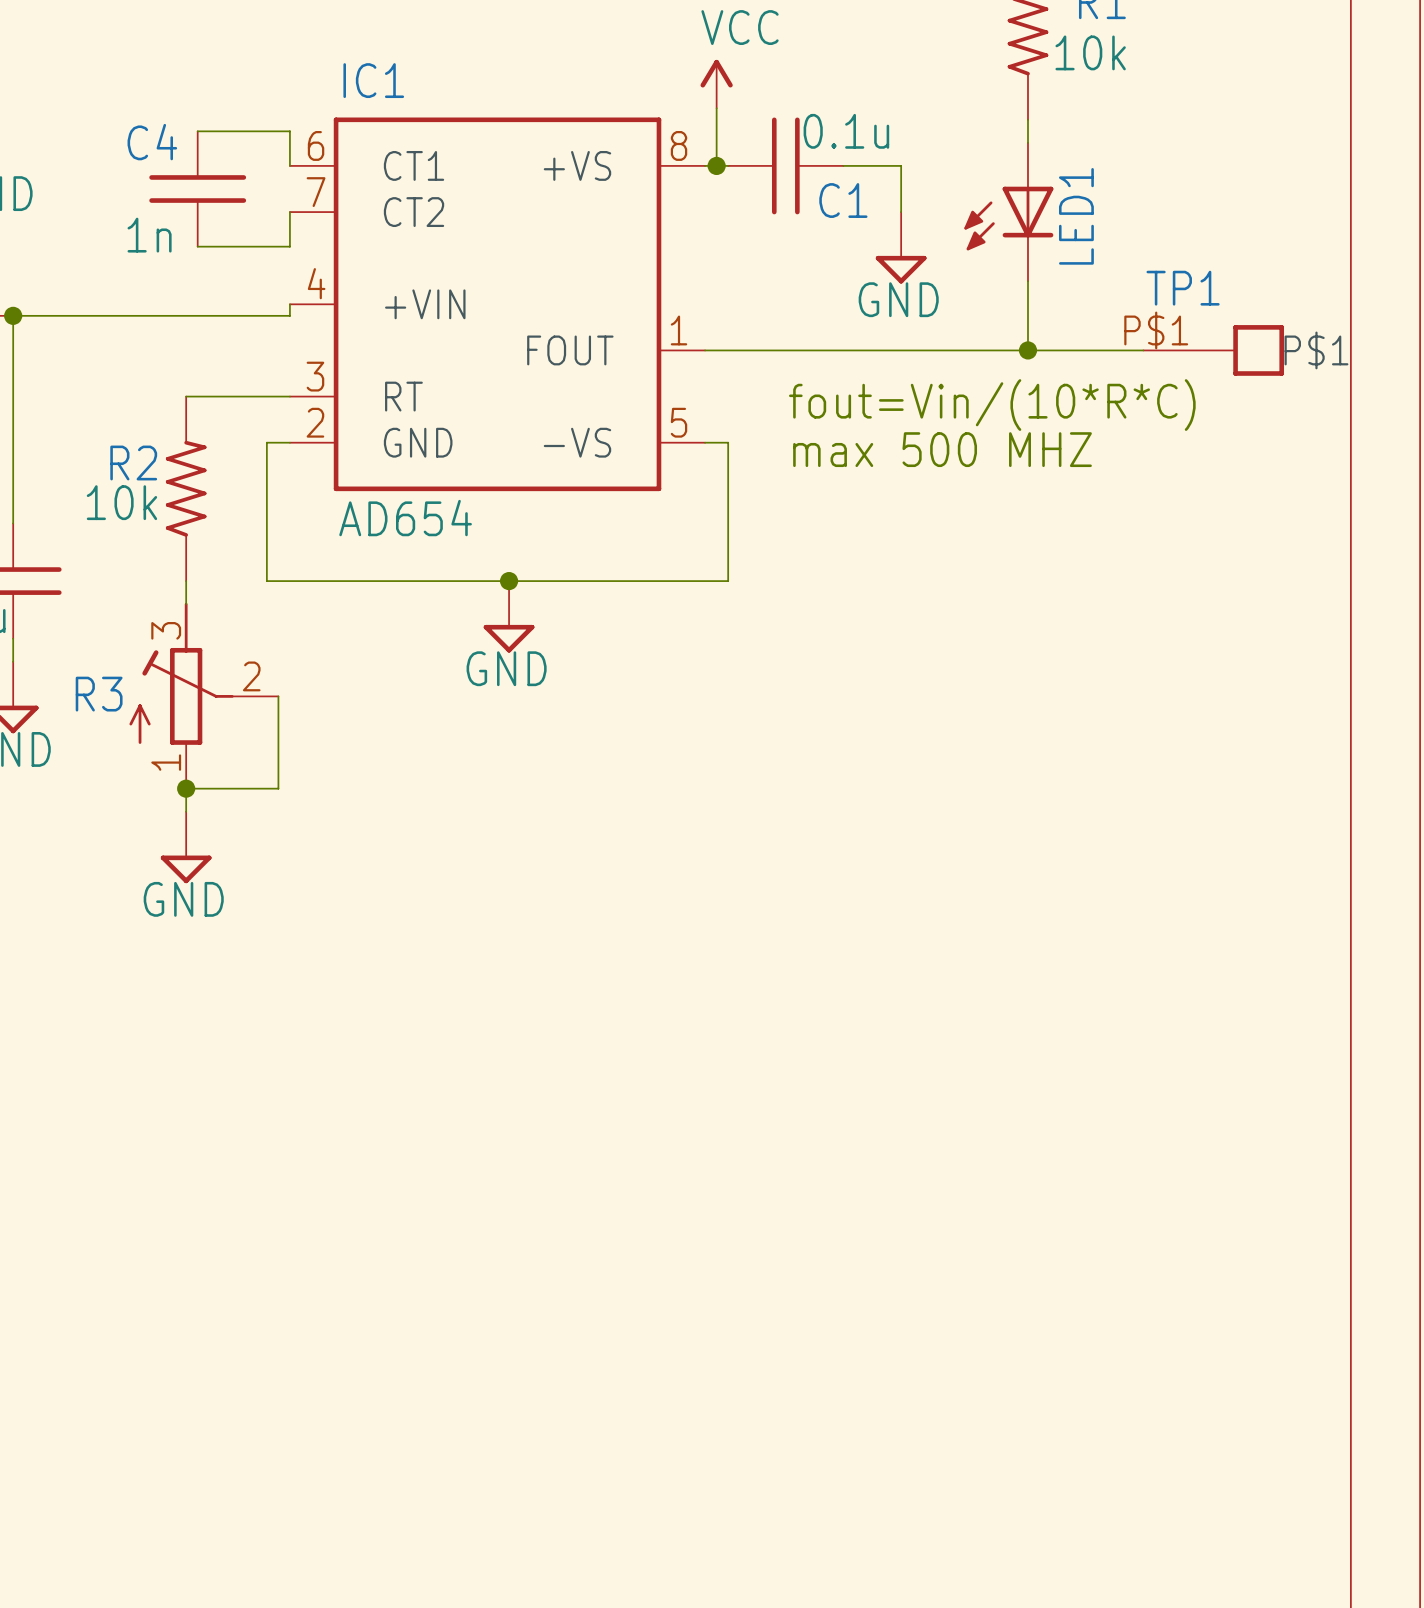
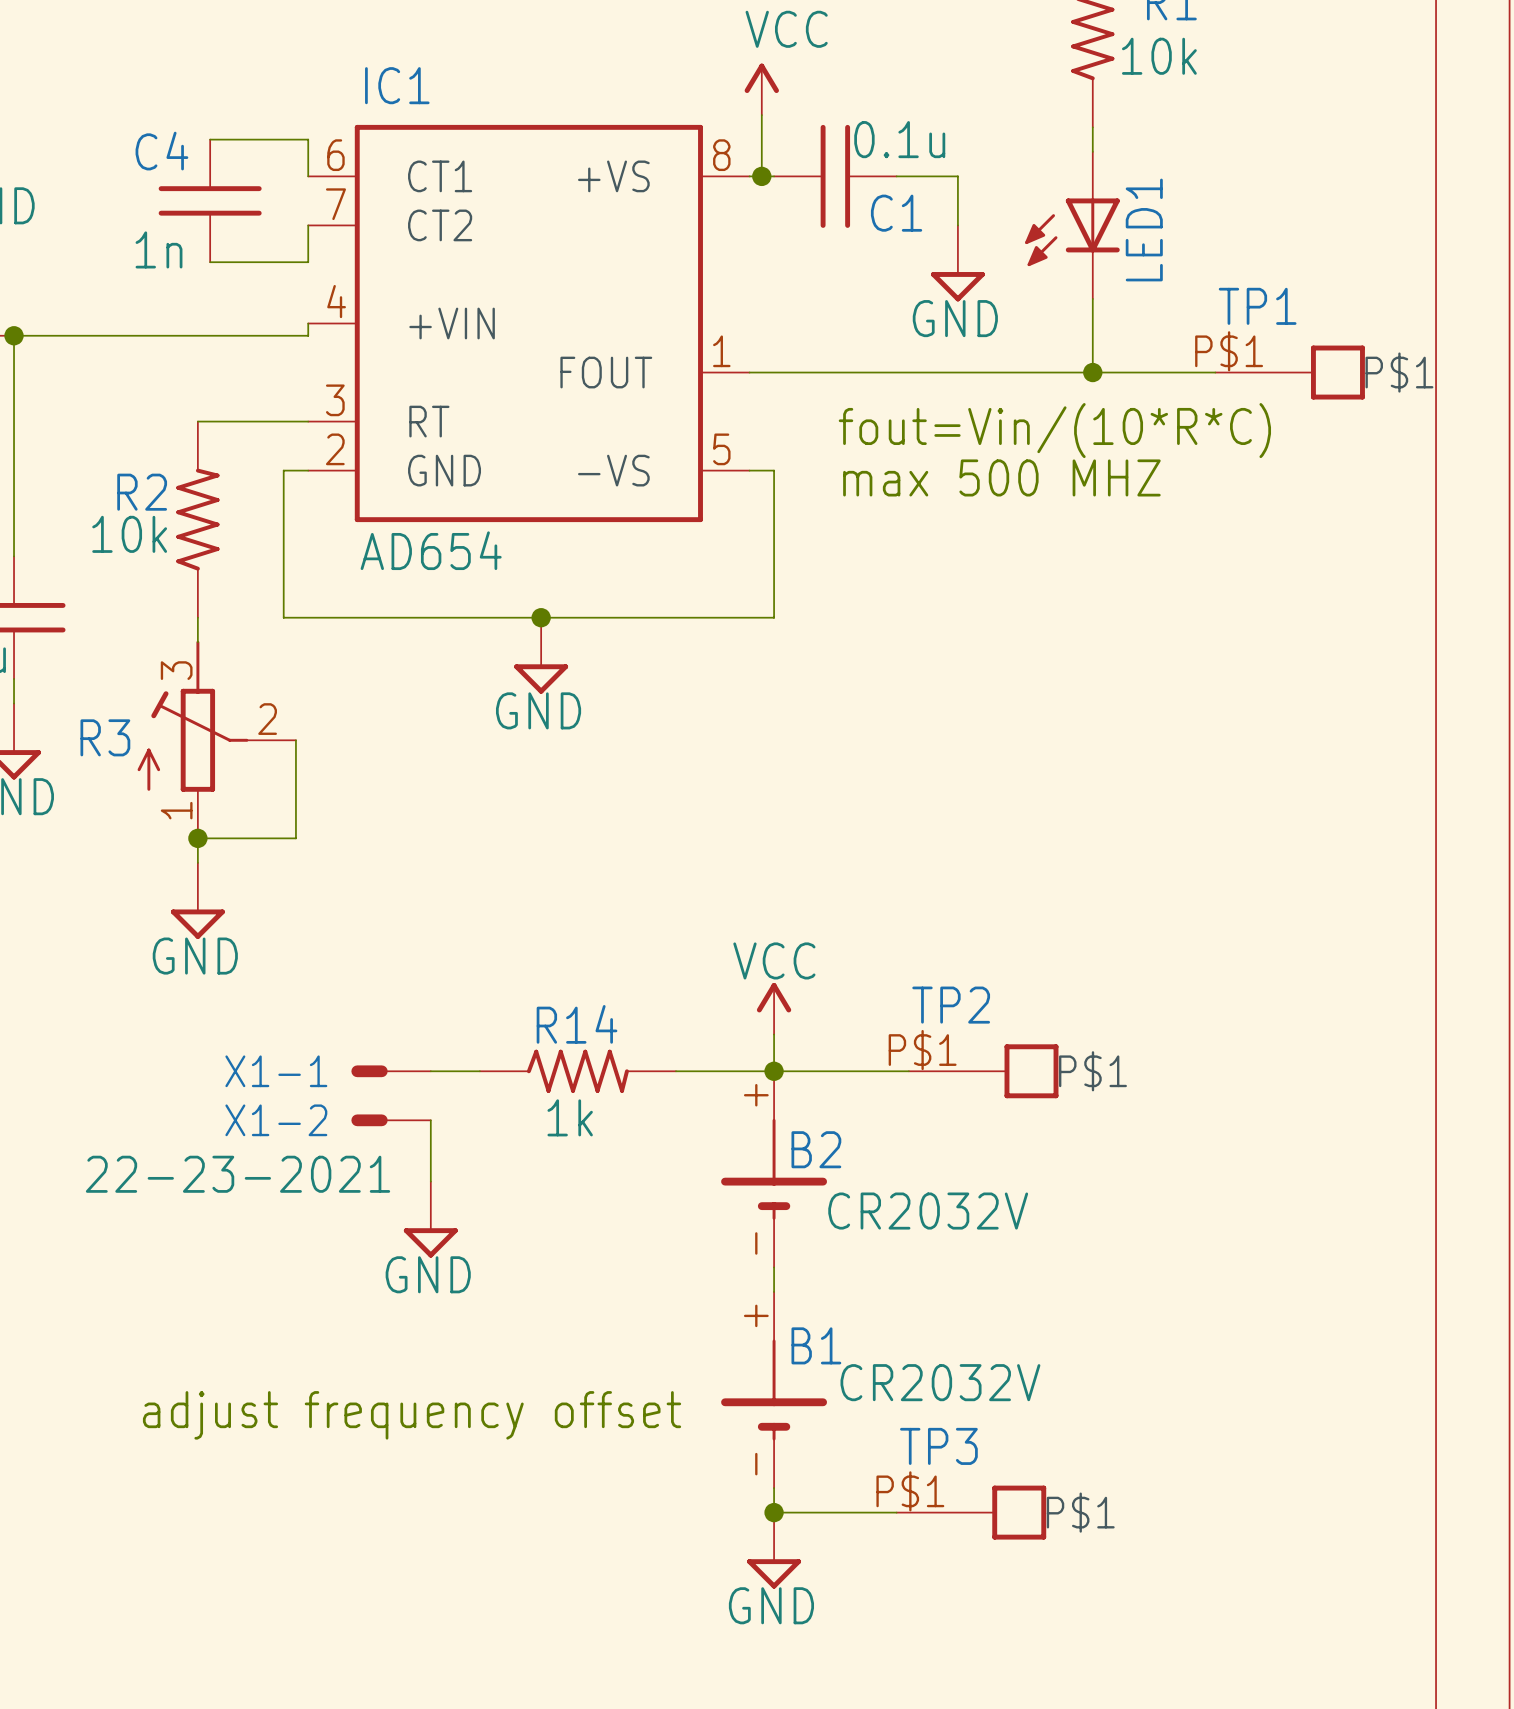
power symbol: none -> VCC (774, 1008)
wire: none -> (774, 1034) (774, 1071)
X1-1: none -> 22-23-2021 (391, 1071)
wire: none -> (430, 1071) (479, 1071)
R14: none -> 1k (577, 1071)
wire: none -> (675, 1071) (908, 1071)
junction: none -> (774, 1071)
TP2: none -> (983, 1071)
X1-2: none -> (391, 1120)
wire: none -> (430, 1120) (430, 1181)
B2: none -> CR2032V (774, 1169)
power symbol: none -> GND (430, 1219)
wire: none -> (774, 1267) (774, 1291)
B1: none -> CR2032V (774, 1390)
text: none -> adjust frequency offset (412, 1415)
wire: none -> (774, 1488) (774, 1512) (896, 1512)
junction: none -> (774, 1512)
TP3: none -> (971, 1512)
power symbol: none -> GND (774, 1550)

